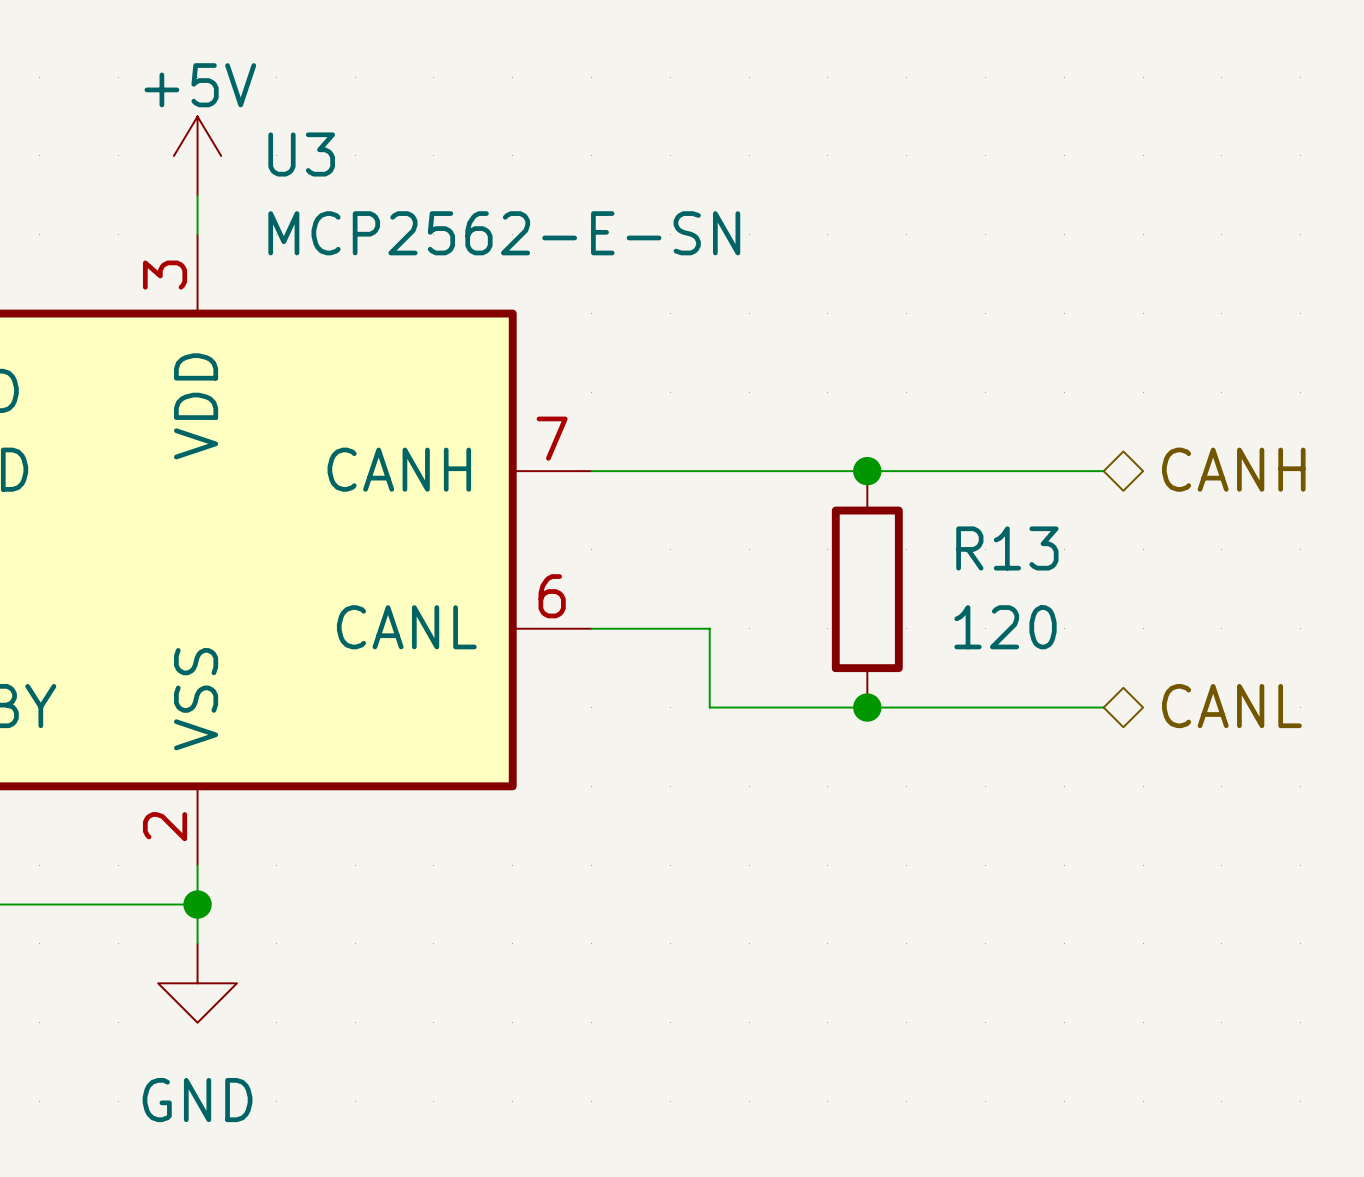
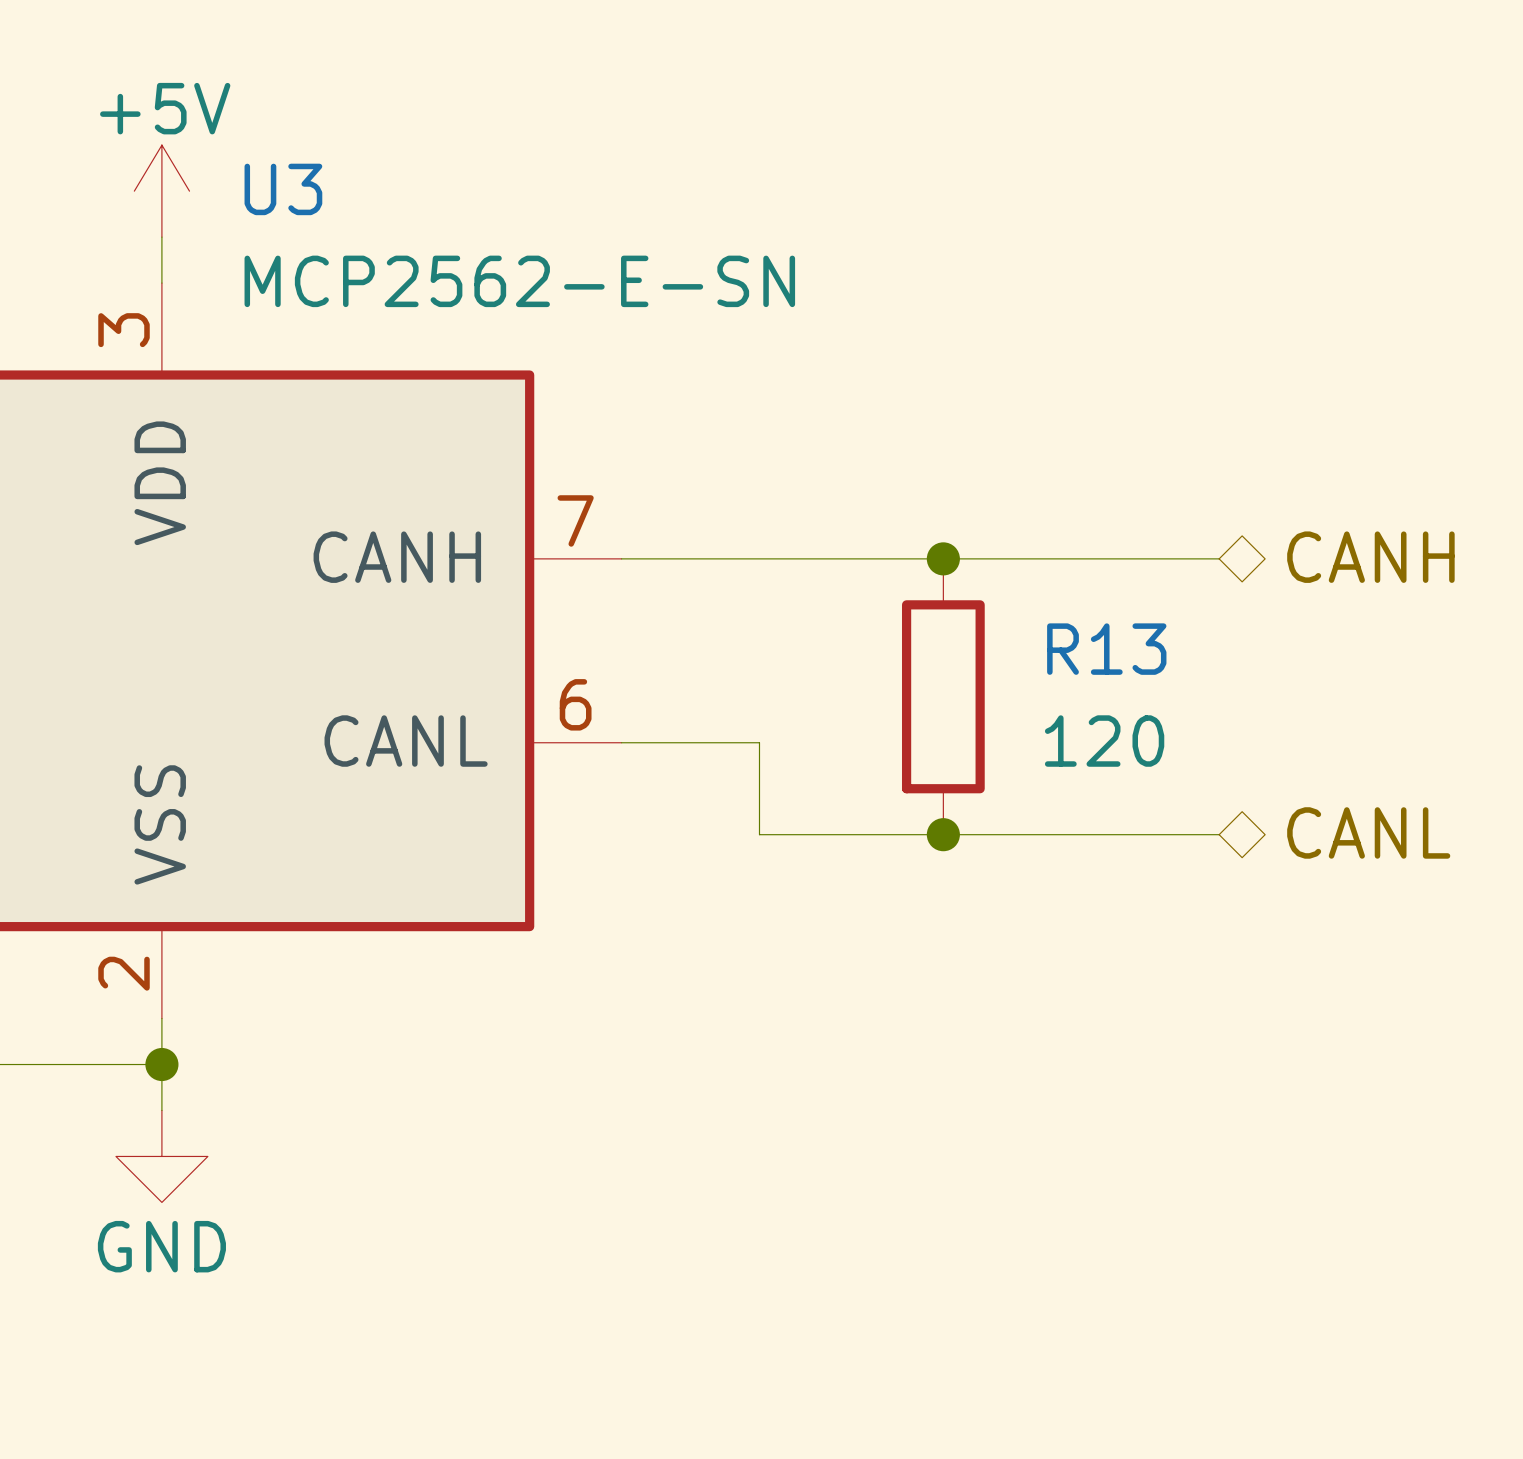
power symbol text position: GND (197, 1100) -> GND (161, 1246)

